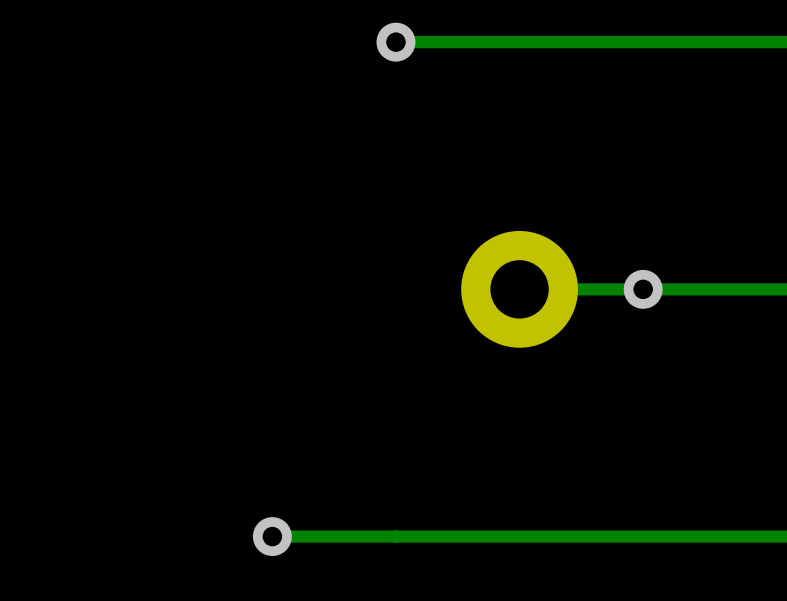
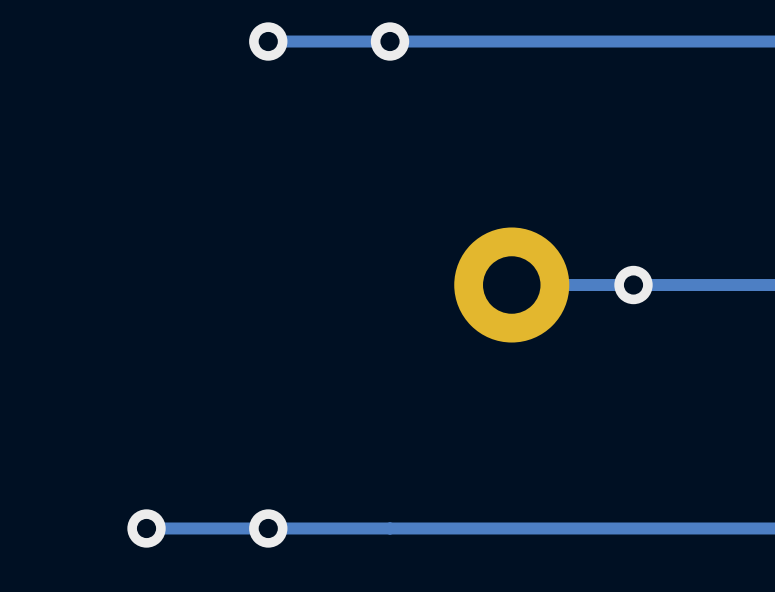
via: none -> (268, 41)
track: none -> (390, 41) (268, 41)
via: none -> (146, 528)
track: none -> (268, 528) (146, 528)

